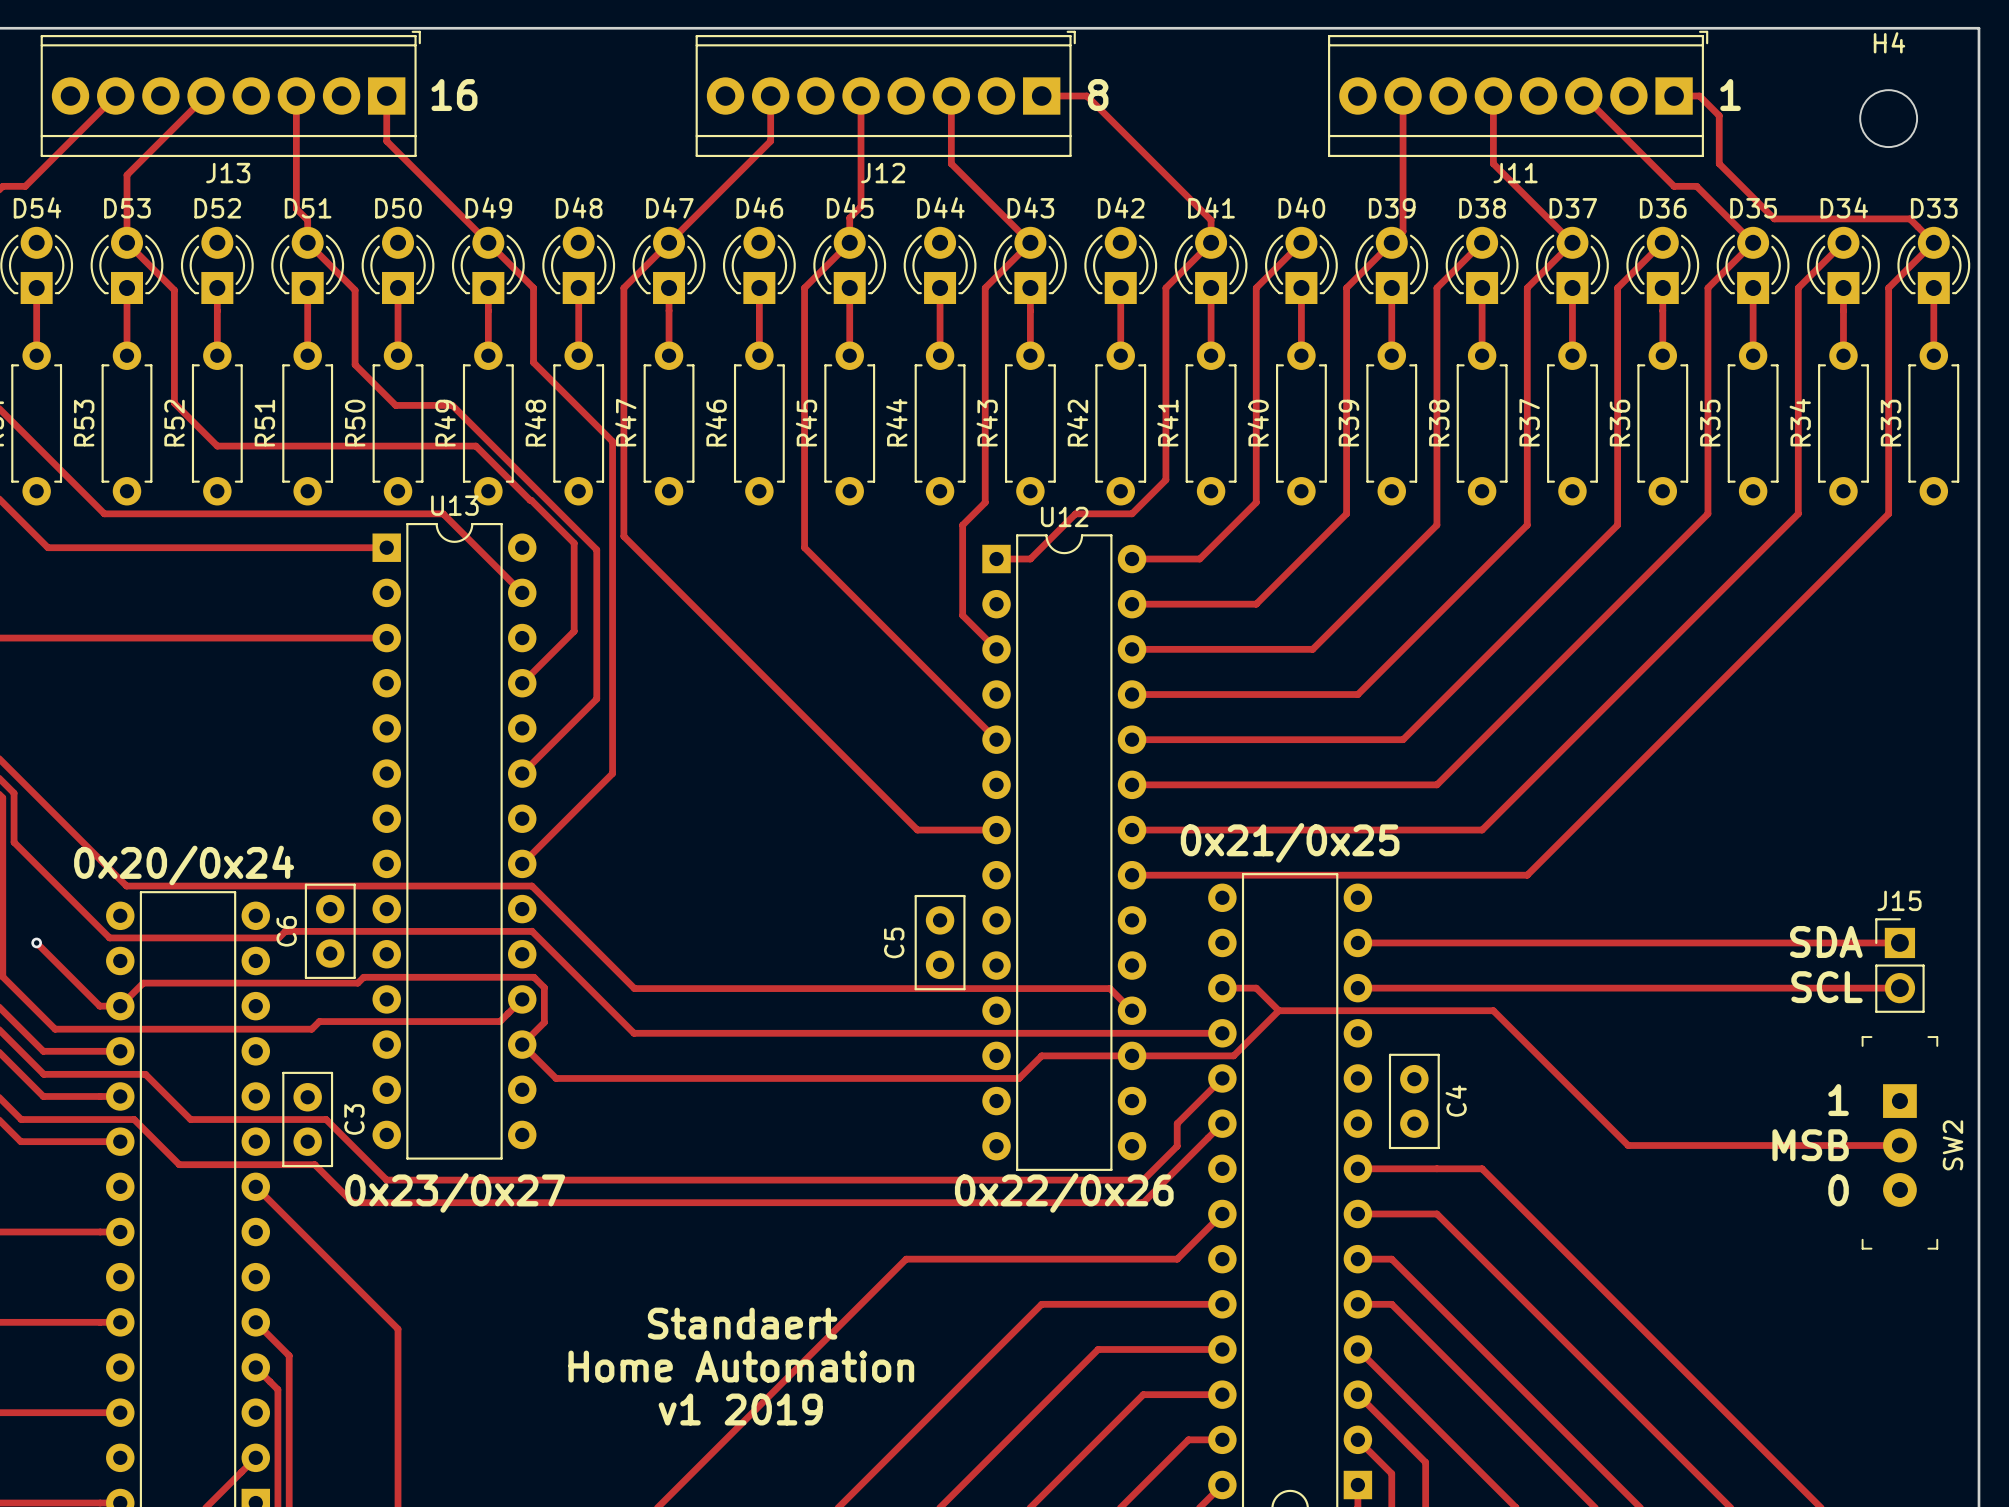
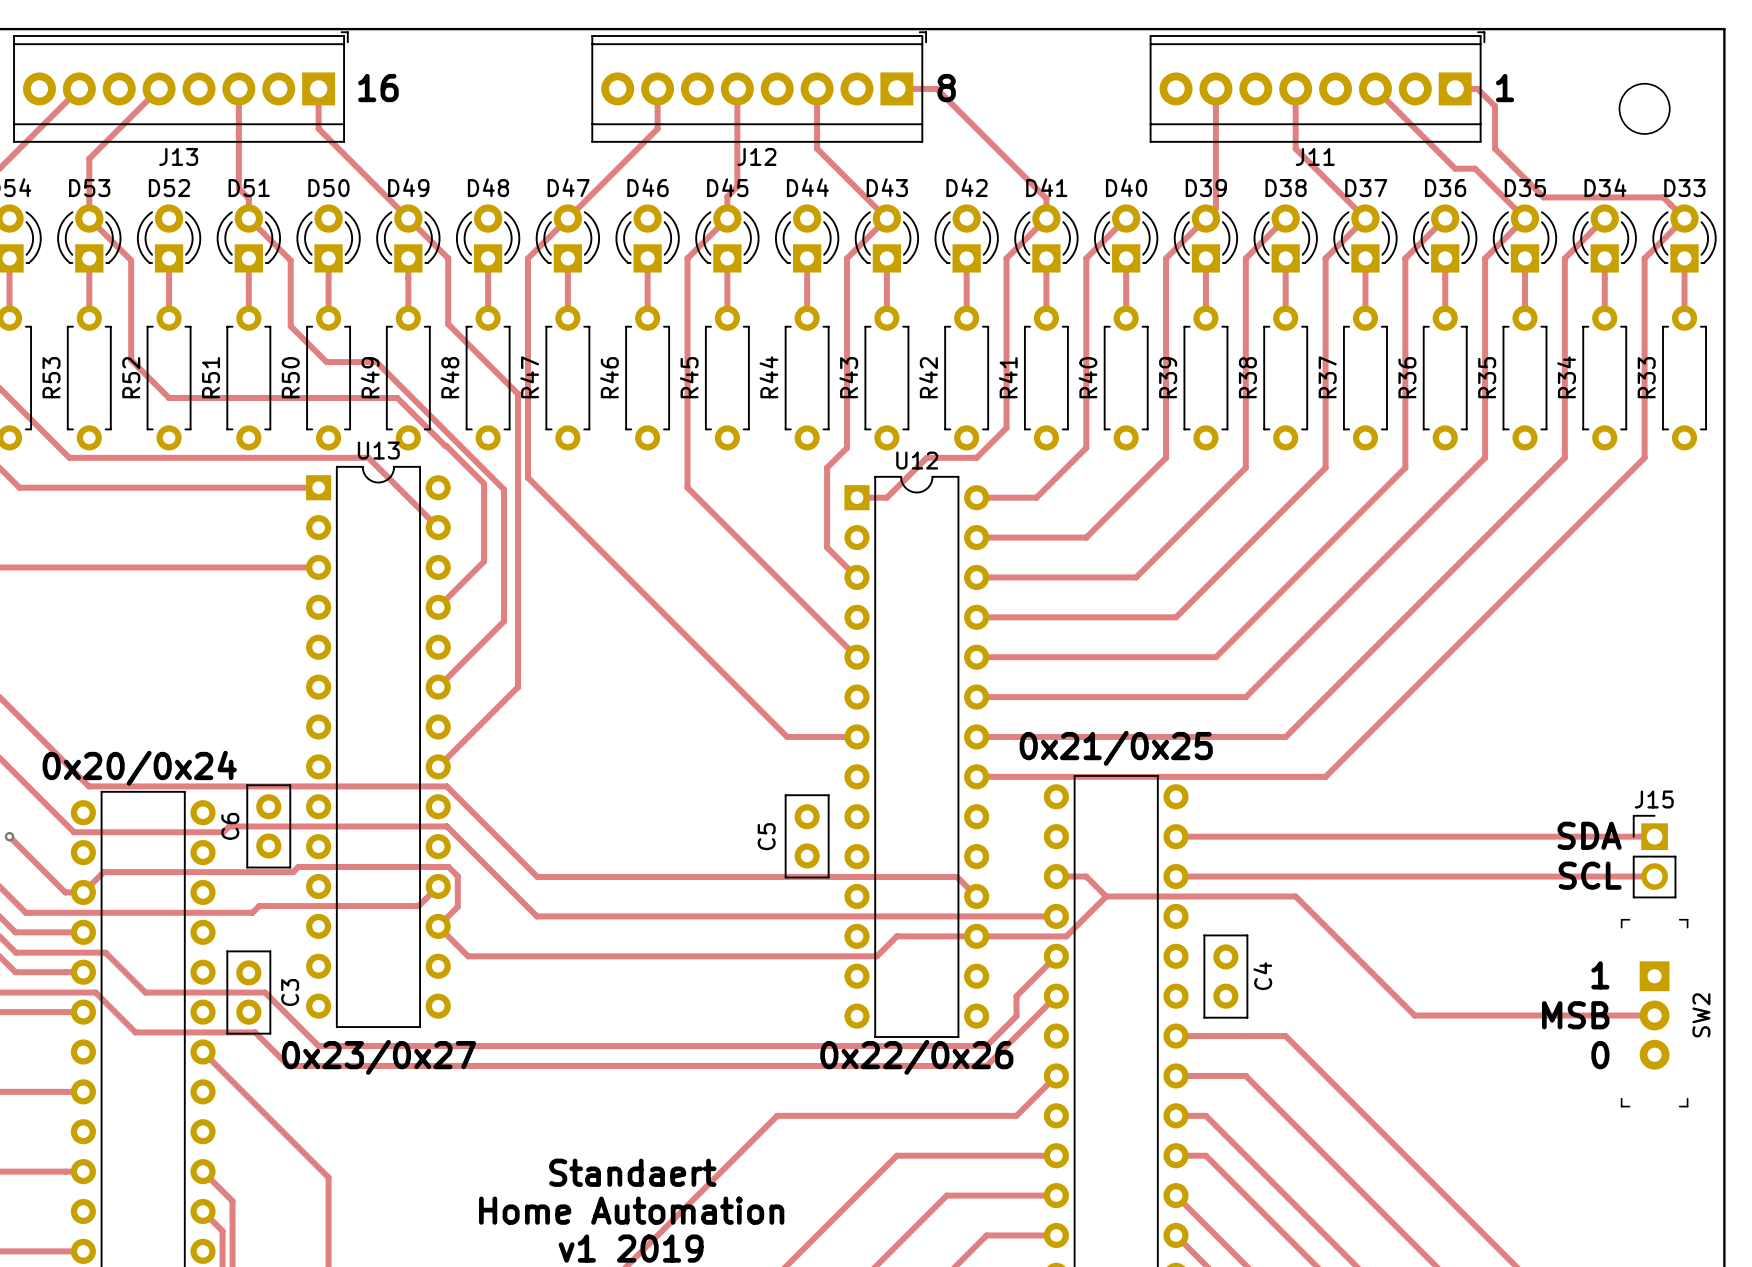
H4 name: H4 (1889, 42) -> none

